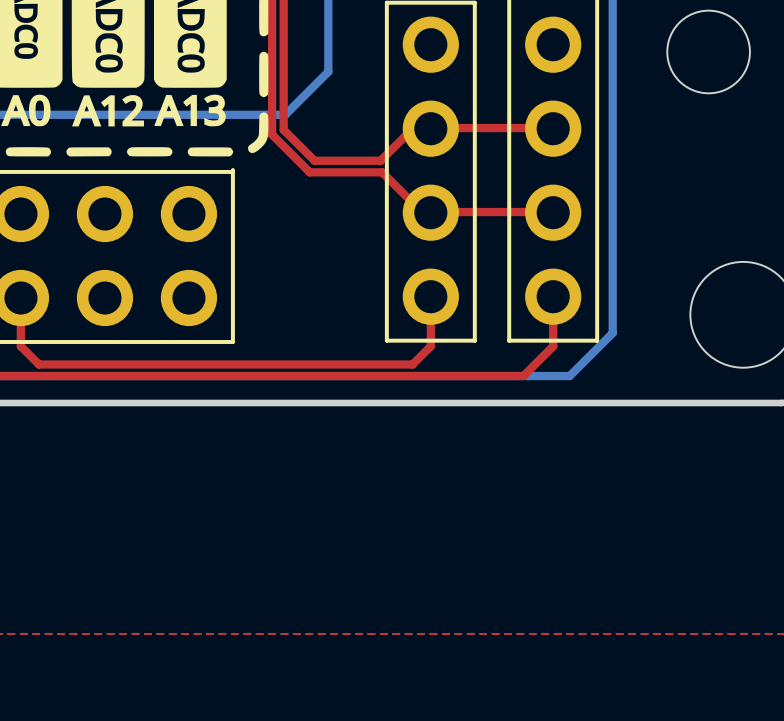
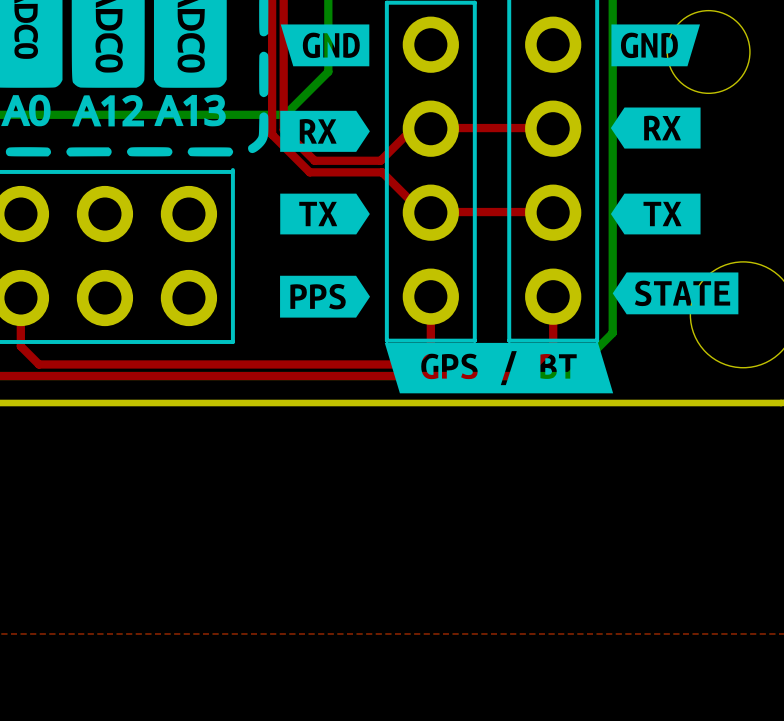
drawing: none -> [280, 24, 370, 67]
drawing: none -> [611, 24, 701, 67]
drawing: none -> [610, 107, 701, 149]
drawing: none -> [280, 110, 370, 152]
drawing: none -> [280, 193, 370, 235]
drawing: none -> [280, 193, 739, 394]

